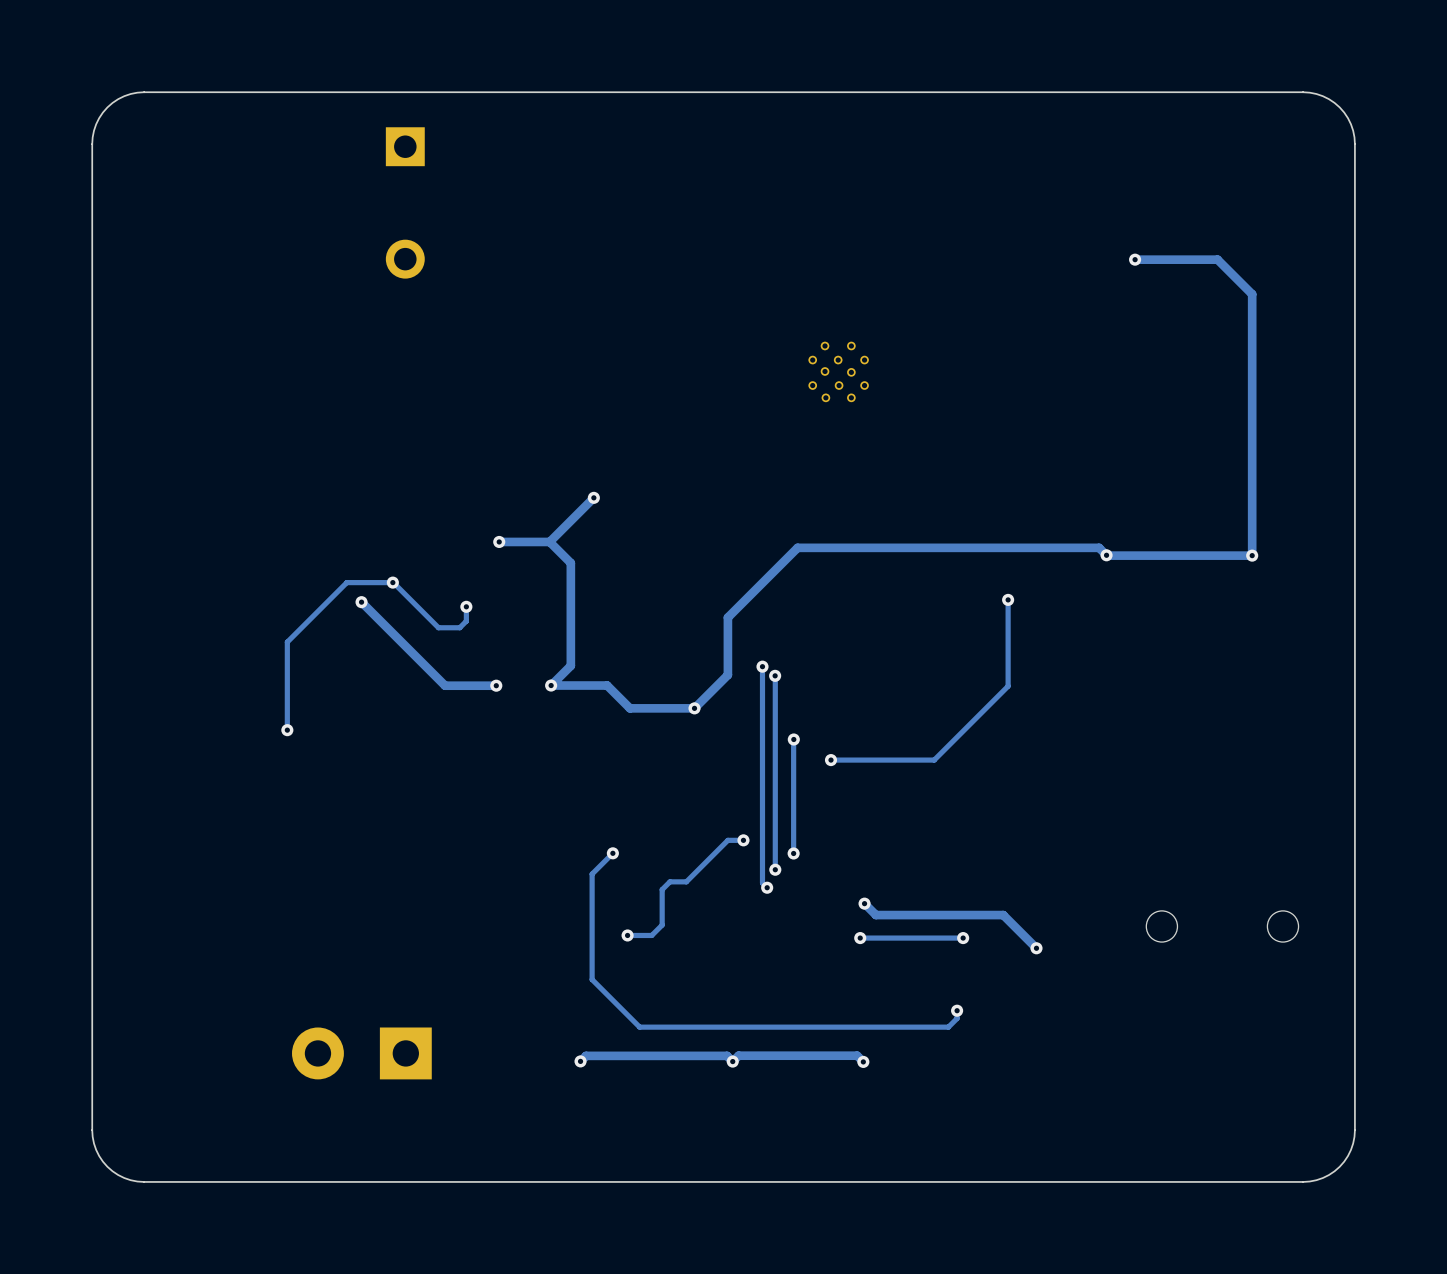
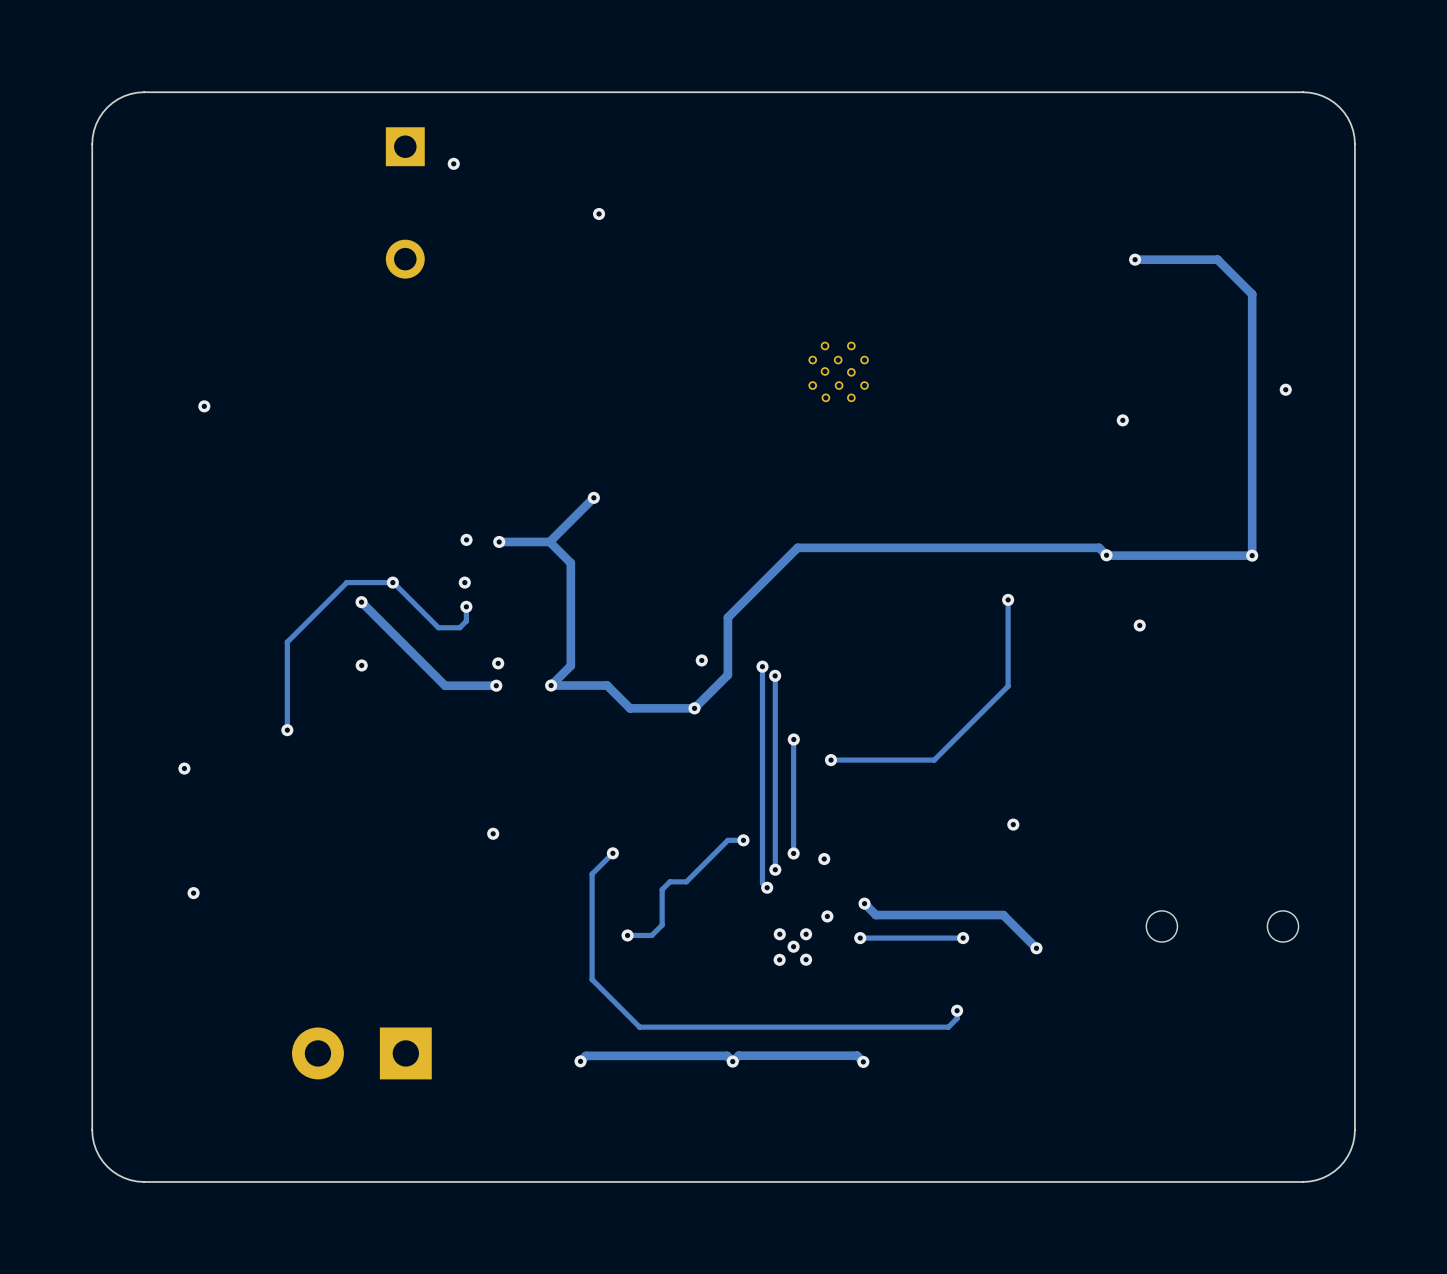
via: none -> (453, 163)
via: none -> (599, 214)
via: none -> (1285, 389)
via: none -> (204, 406)
via: none -> (1122, 420)
via: none -> (466, 539)
via: none -> (464, 582)
via: none -> (1139, 625)
via: none -> (701, 660)
via: none -> (498, 663)
via: none -> (361, 665)
via: none -> (184, 768)
via: none -> (1013, 824)
via: none -> (493, 833)
via: none -> (824, 859)
via: none -> (193, 893)
via: none -> (827, 916)
via: none -> (779, 934)
via: none -> (806, 934)
via: none -> (793, 946)
via: none -> (779, 959)
via: none -> (806, 959)

